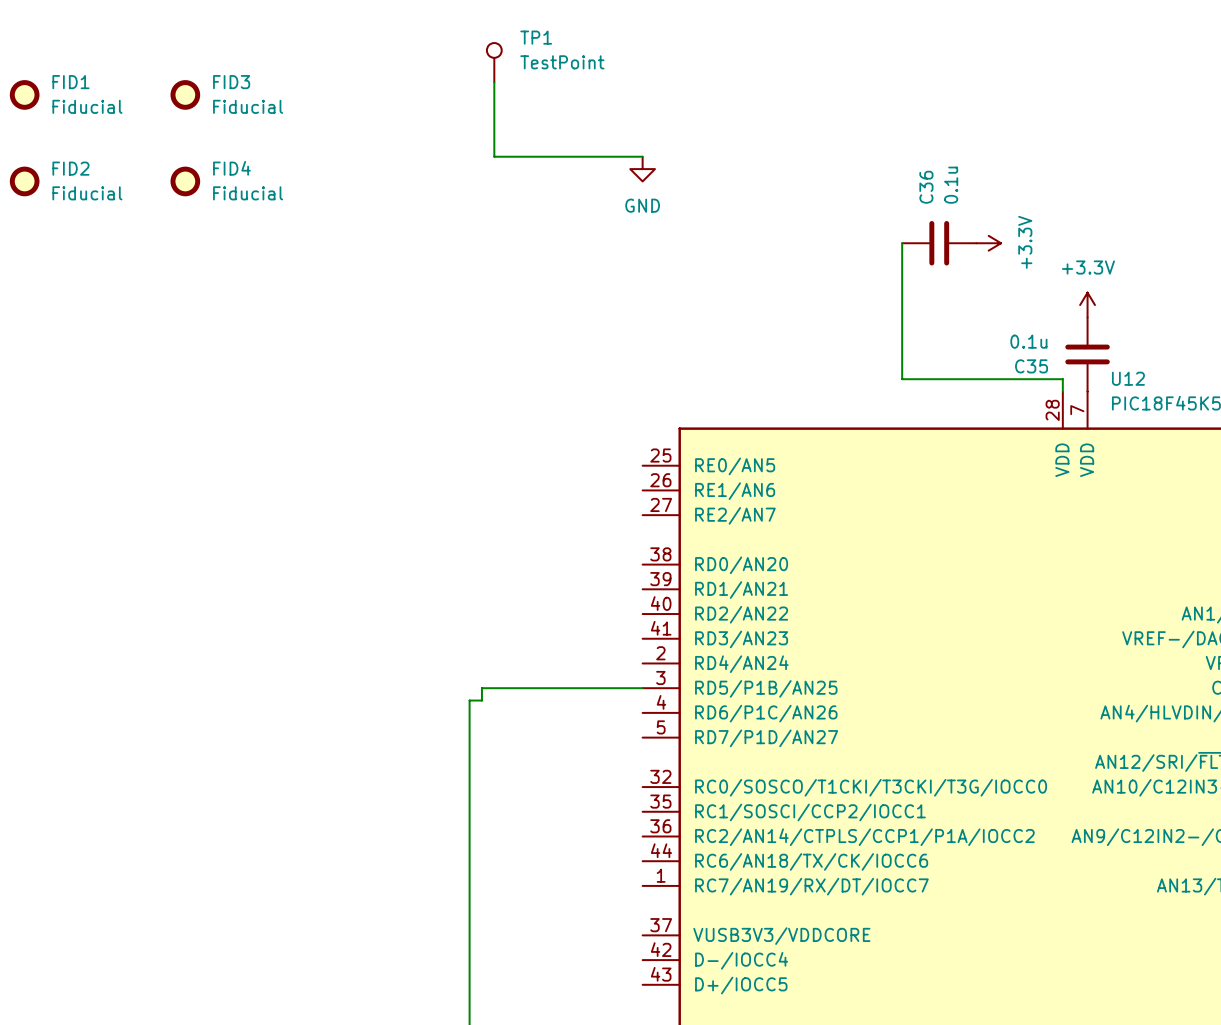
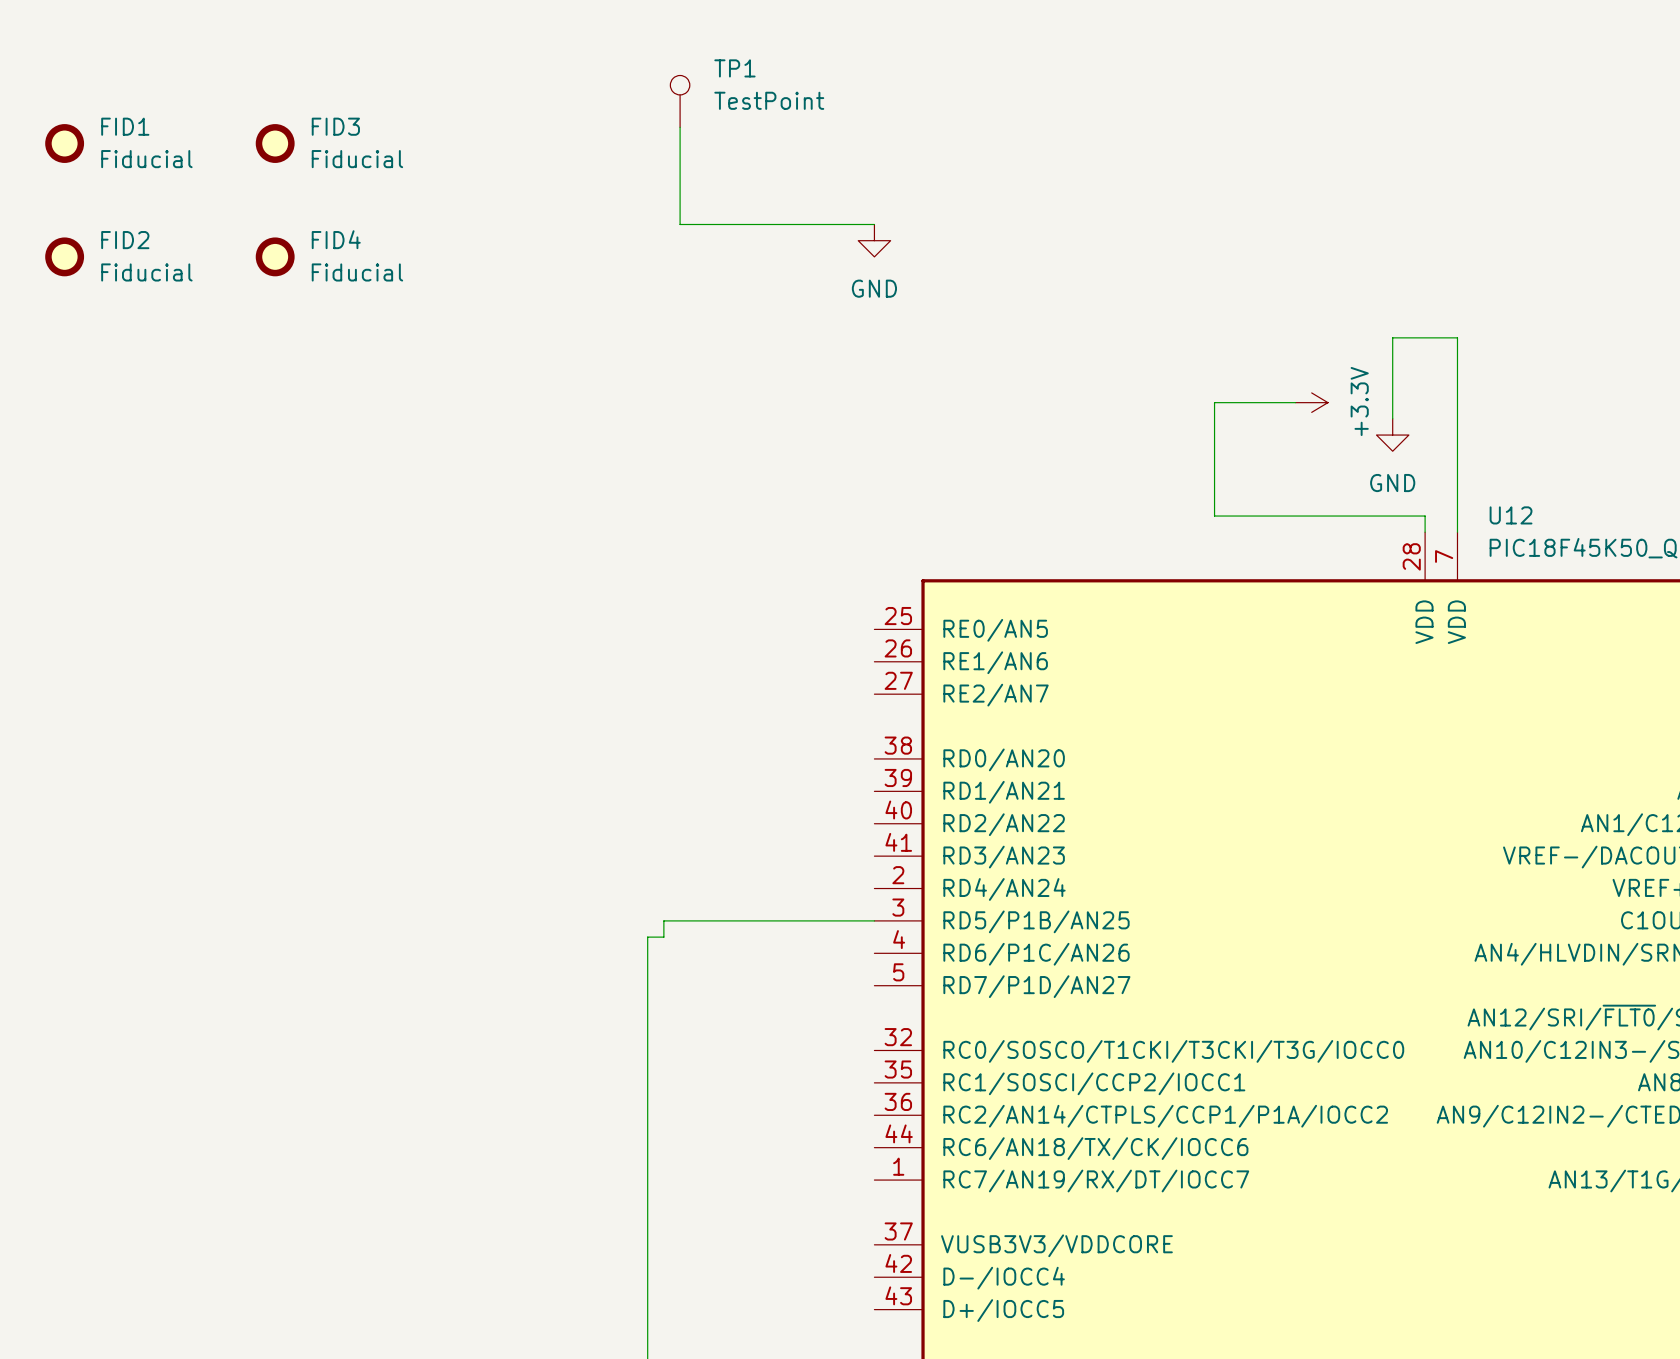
wire: (902, 243) (902, 292) -> (1295, 402) (1214, 402)
C36: 0.1u (939, 243) -> none
power symbol position: +3.3V (988, 243) -> +3.3V (1311, 402)
wire: none -> (1392, 418) (1392, 337) (1457, 337) (1457, 532)
power symbol: +3.3V (1087, 305) -> none
power symbol: none -> GND (1392, 435)
C35: 0.1u (1087, 354) -> none

